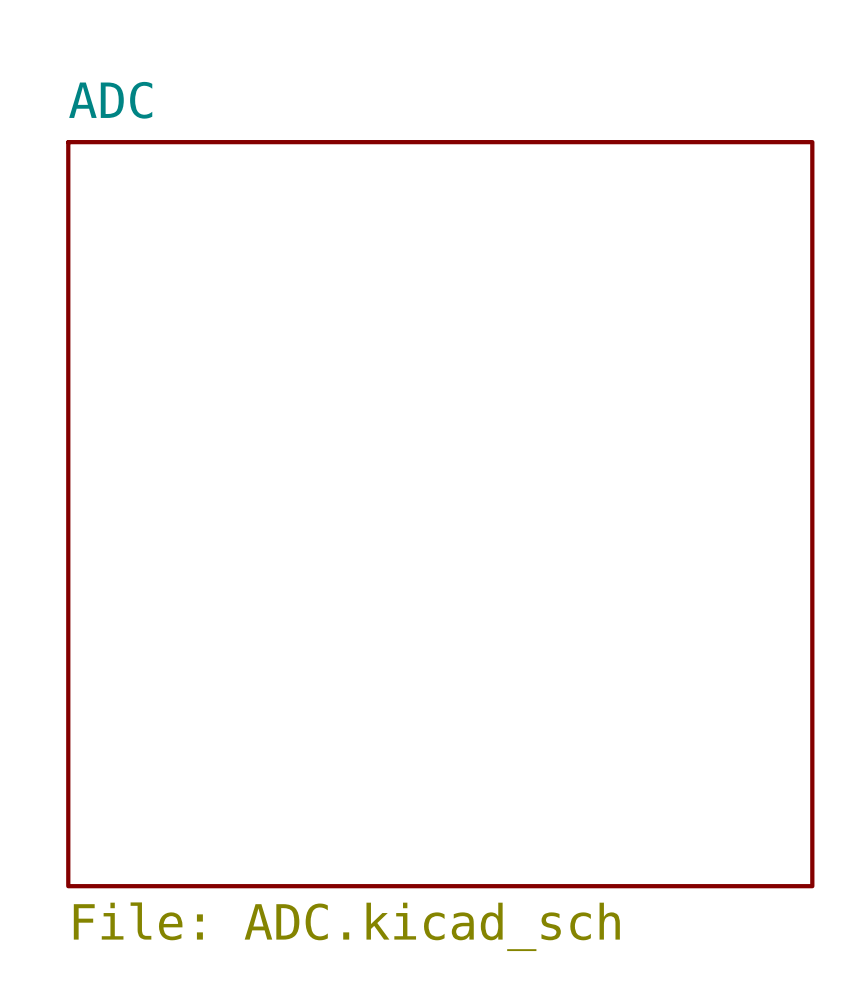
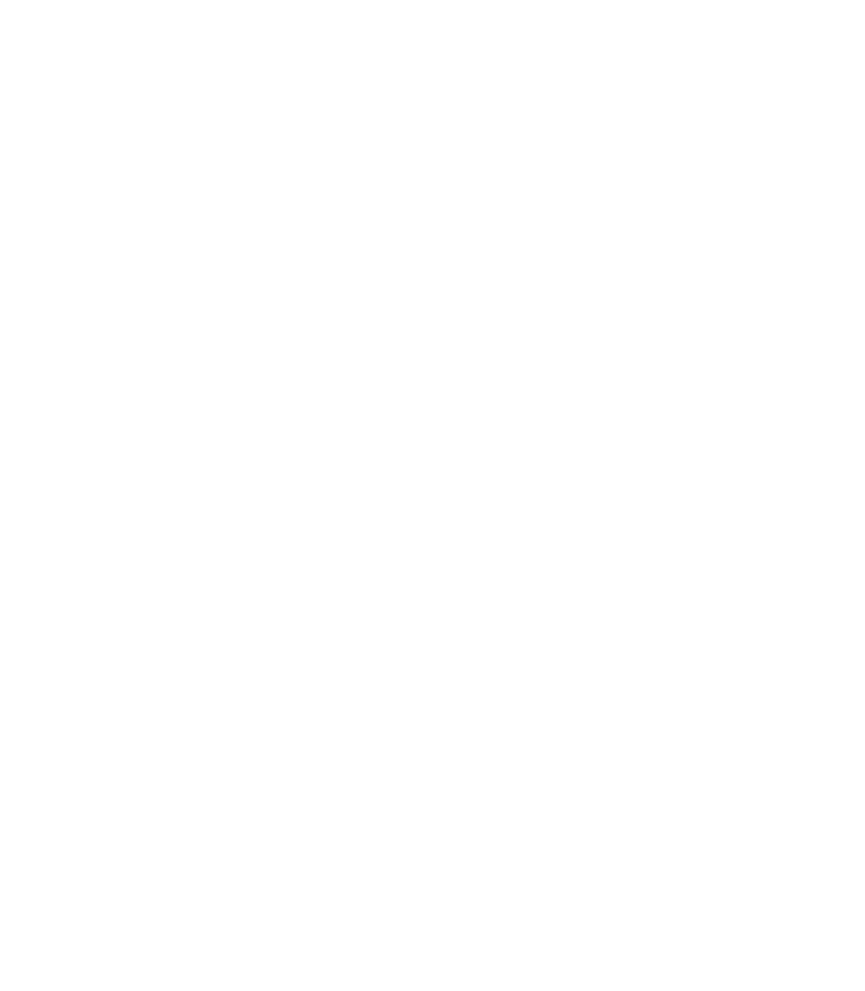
sheet ADC: File: ADC.kicad_sch (440, 514) -> none

